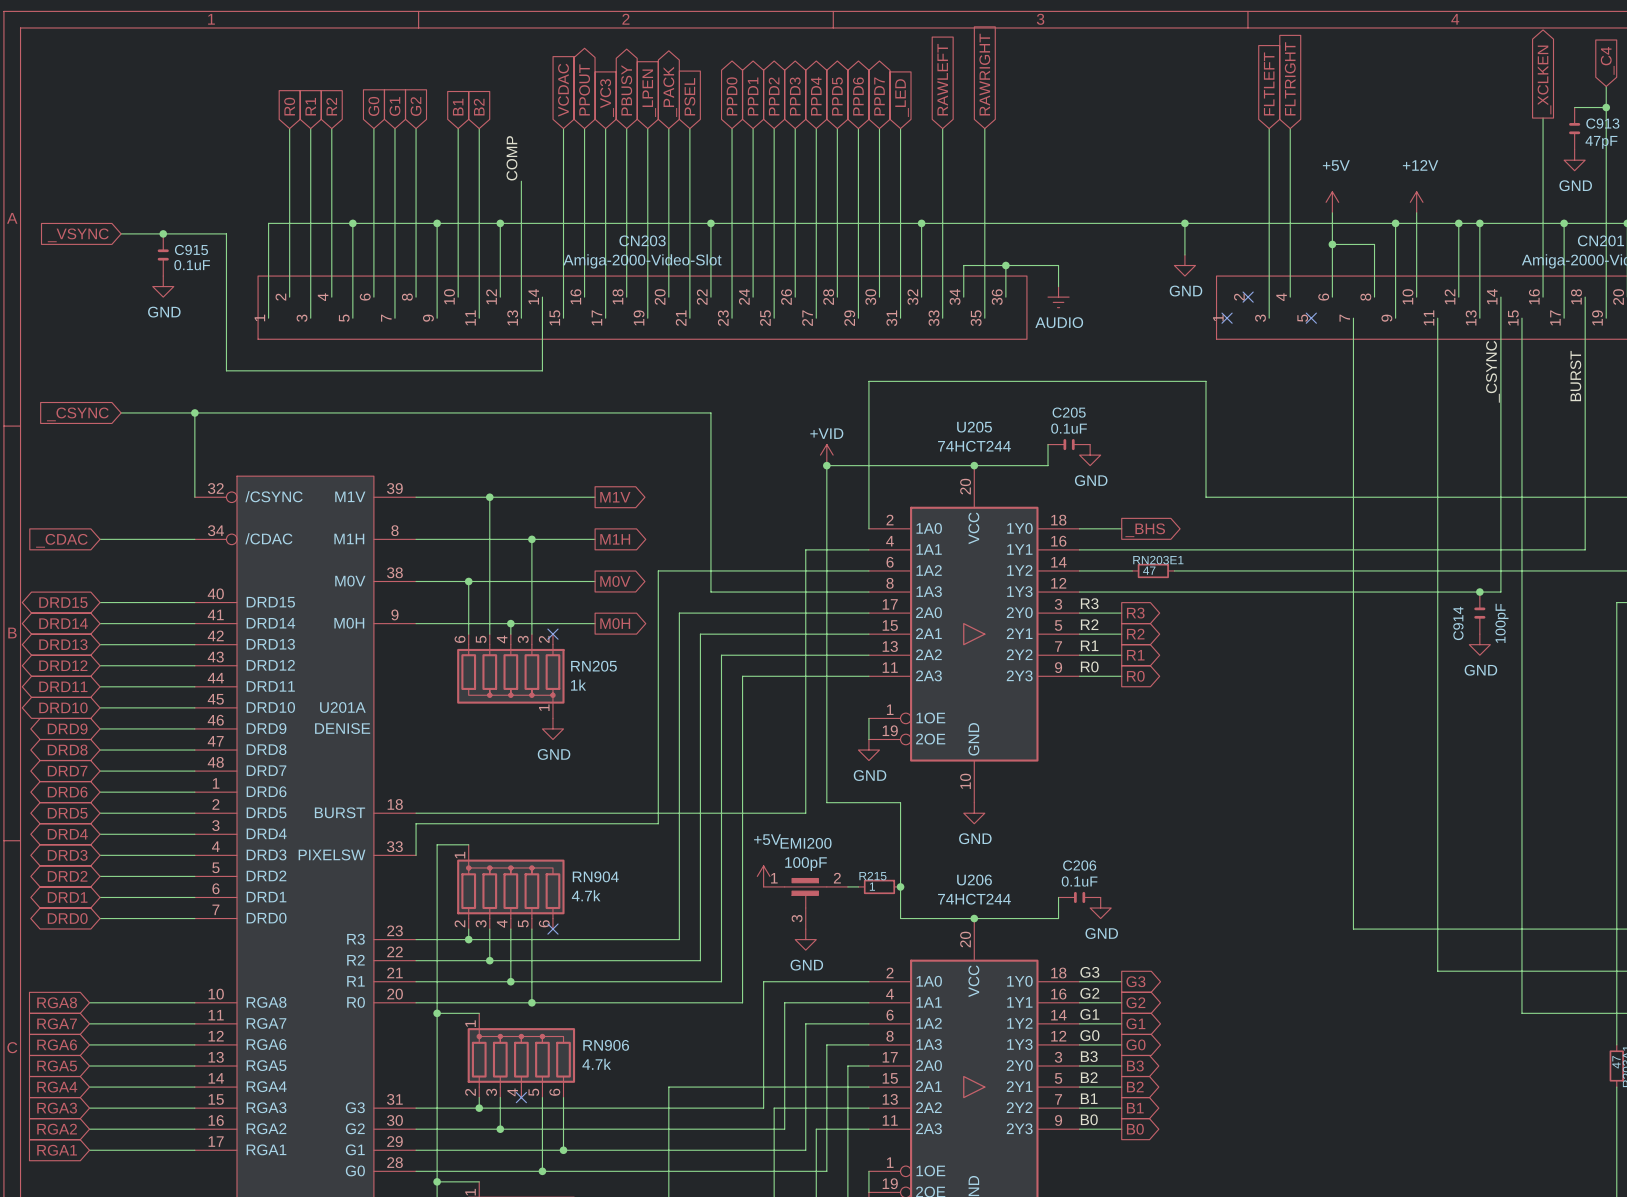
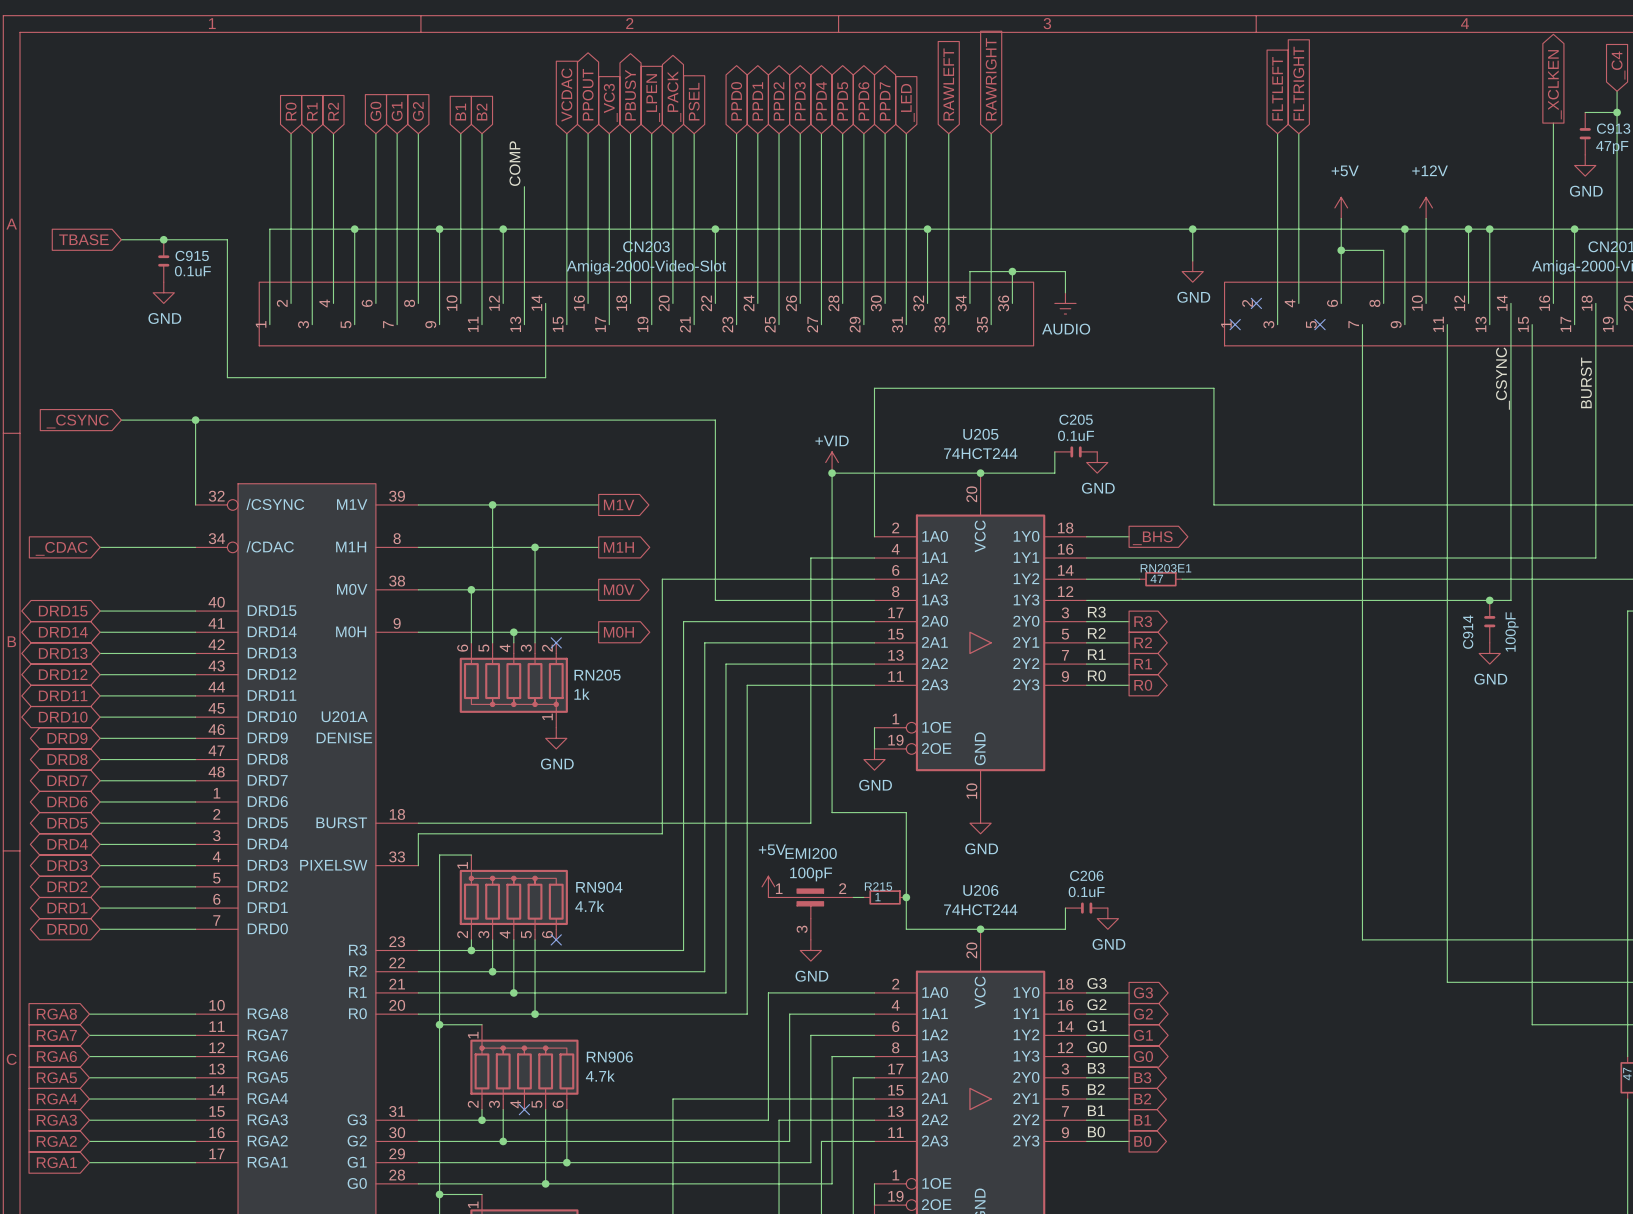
global label: _VSYNC (78, 235) -> TBASE (83, 239)

